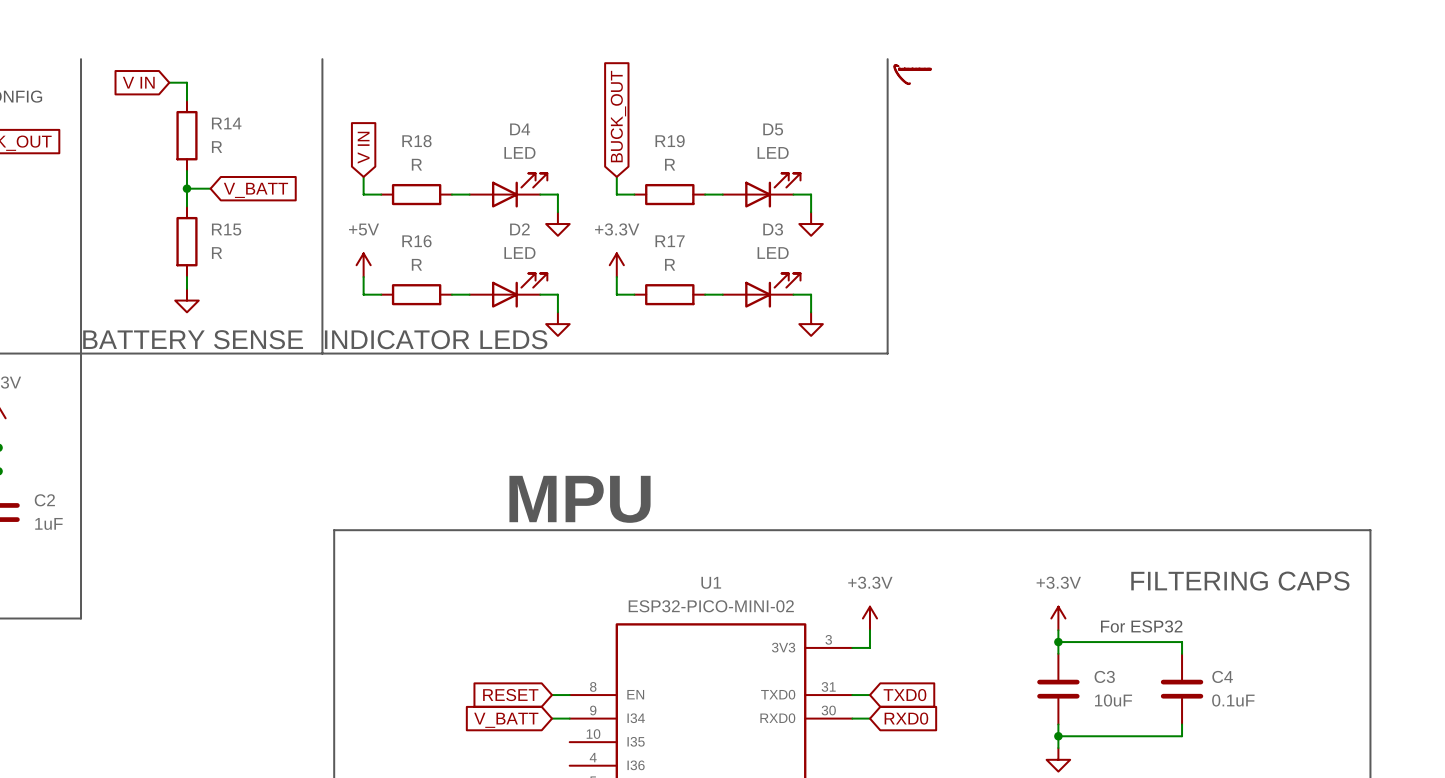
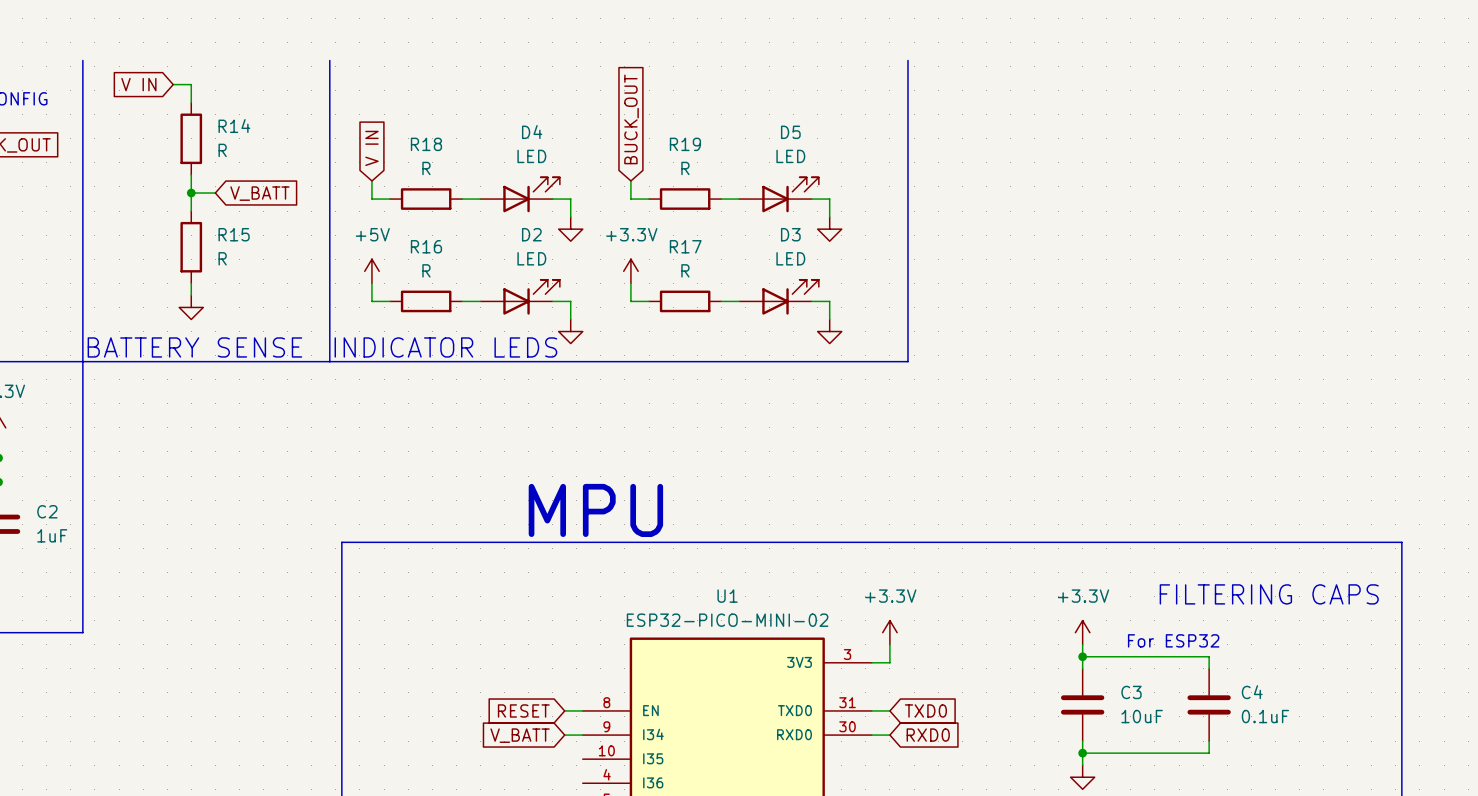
power symbol: (912, 74) -> none

